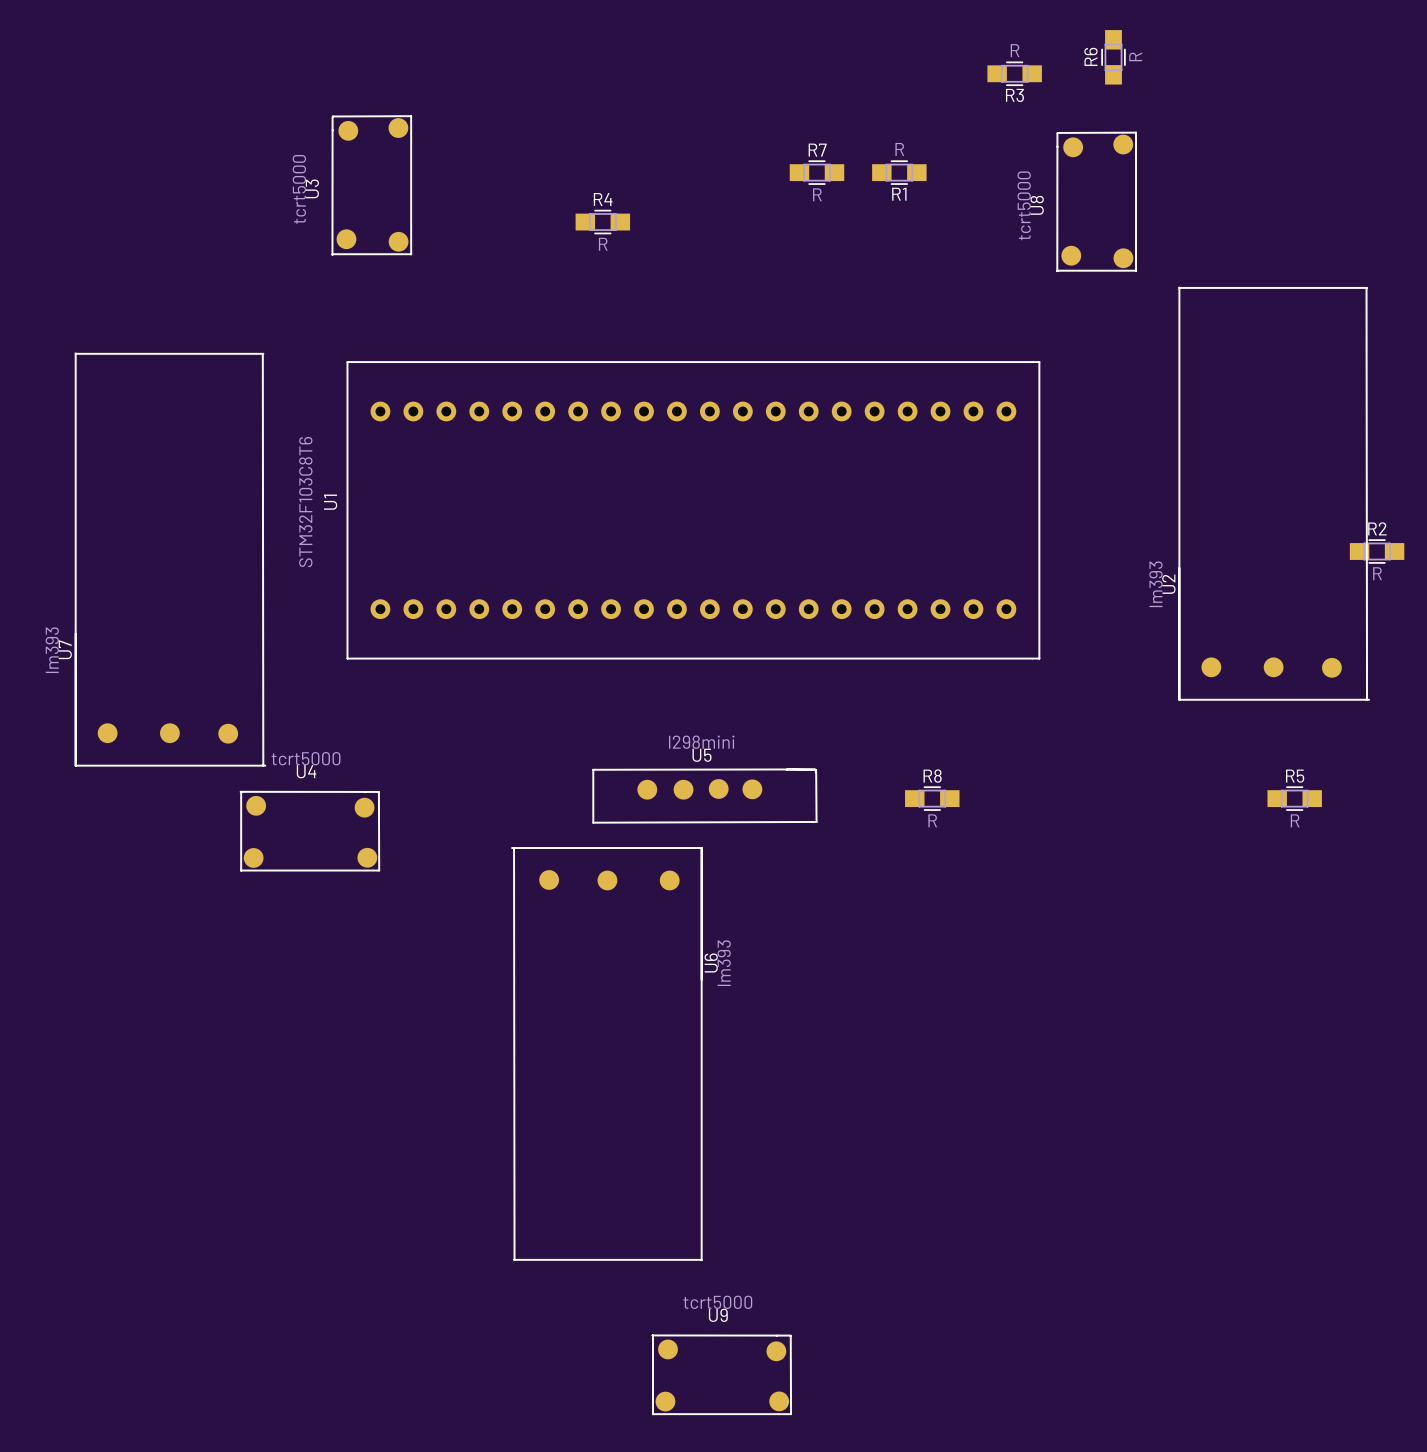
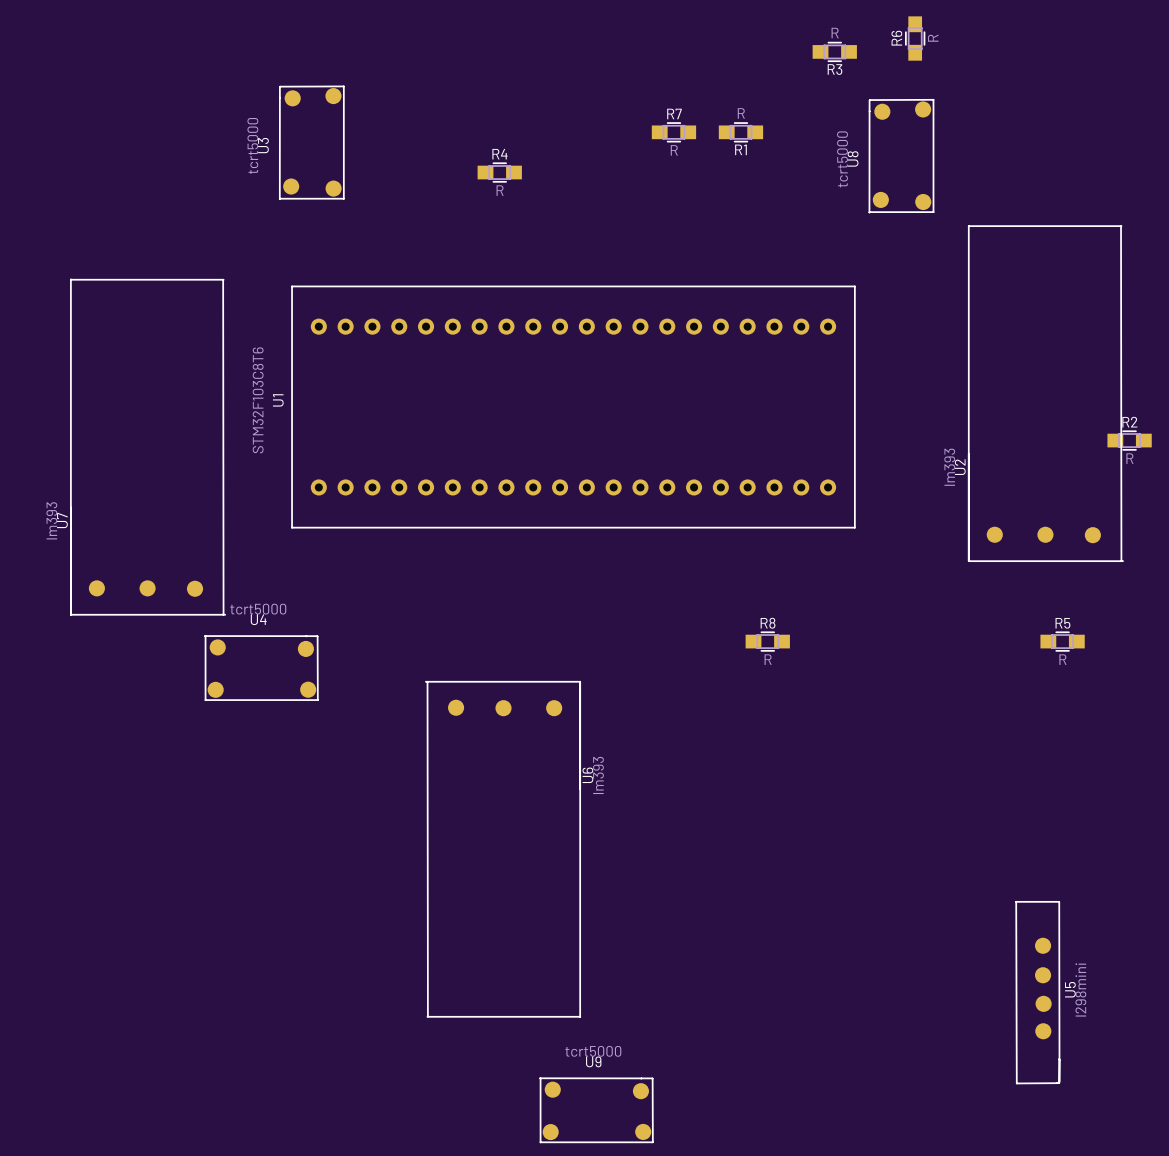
U5 rotation: 0° (704, 796) -> 90° clockwise (1037, 992)
U5 position: (704, 796) -> (1037, 992)

